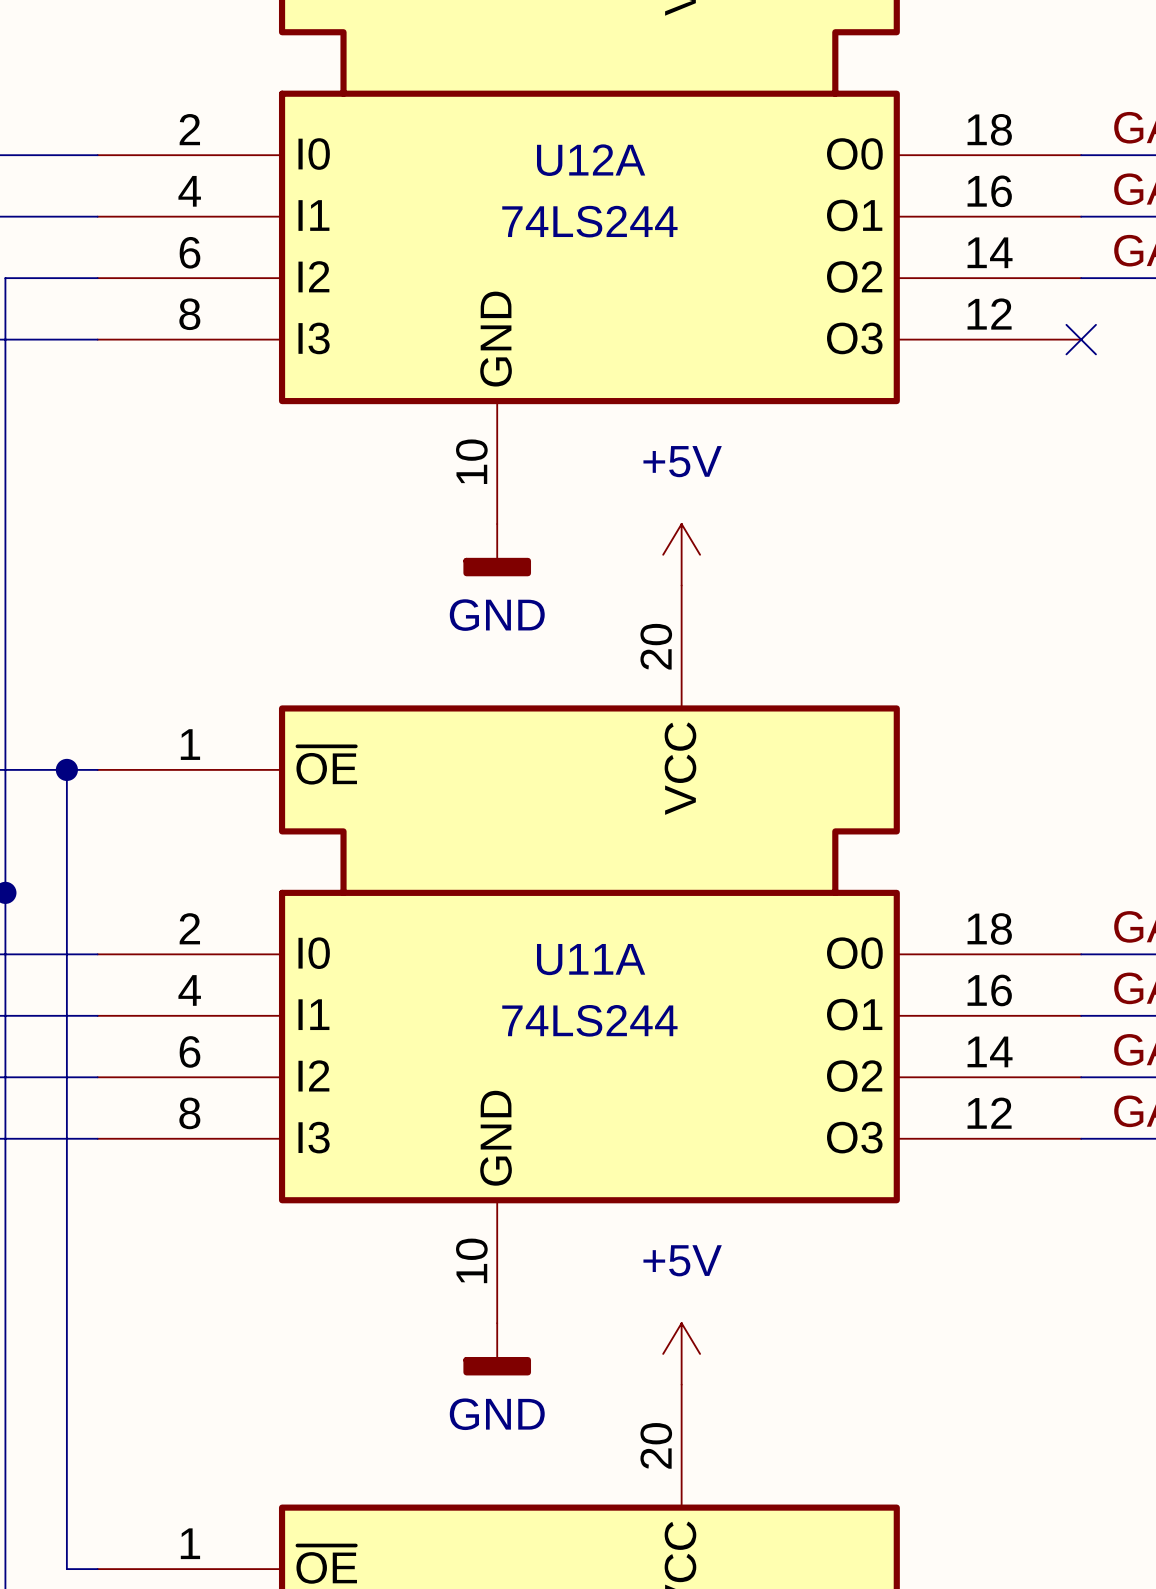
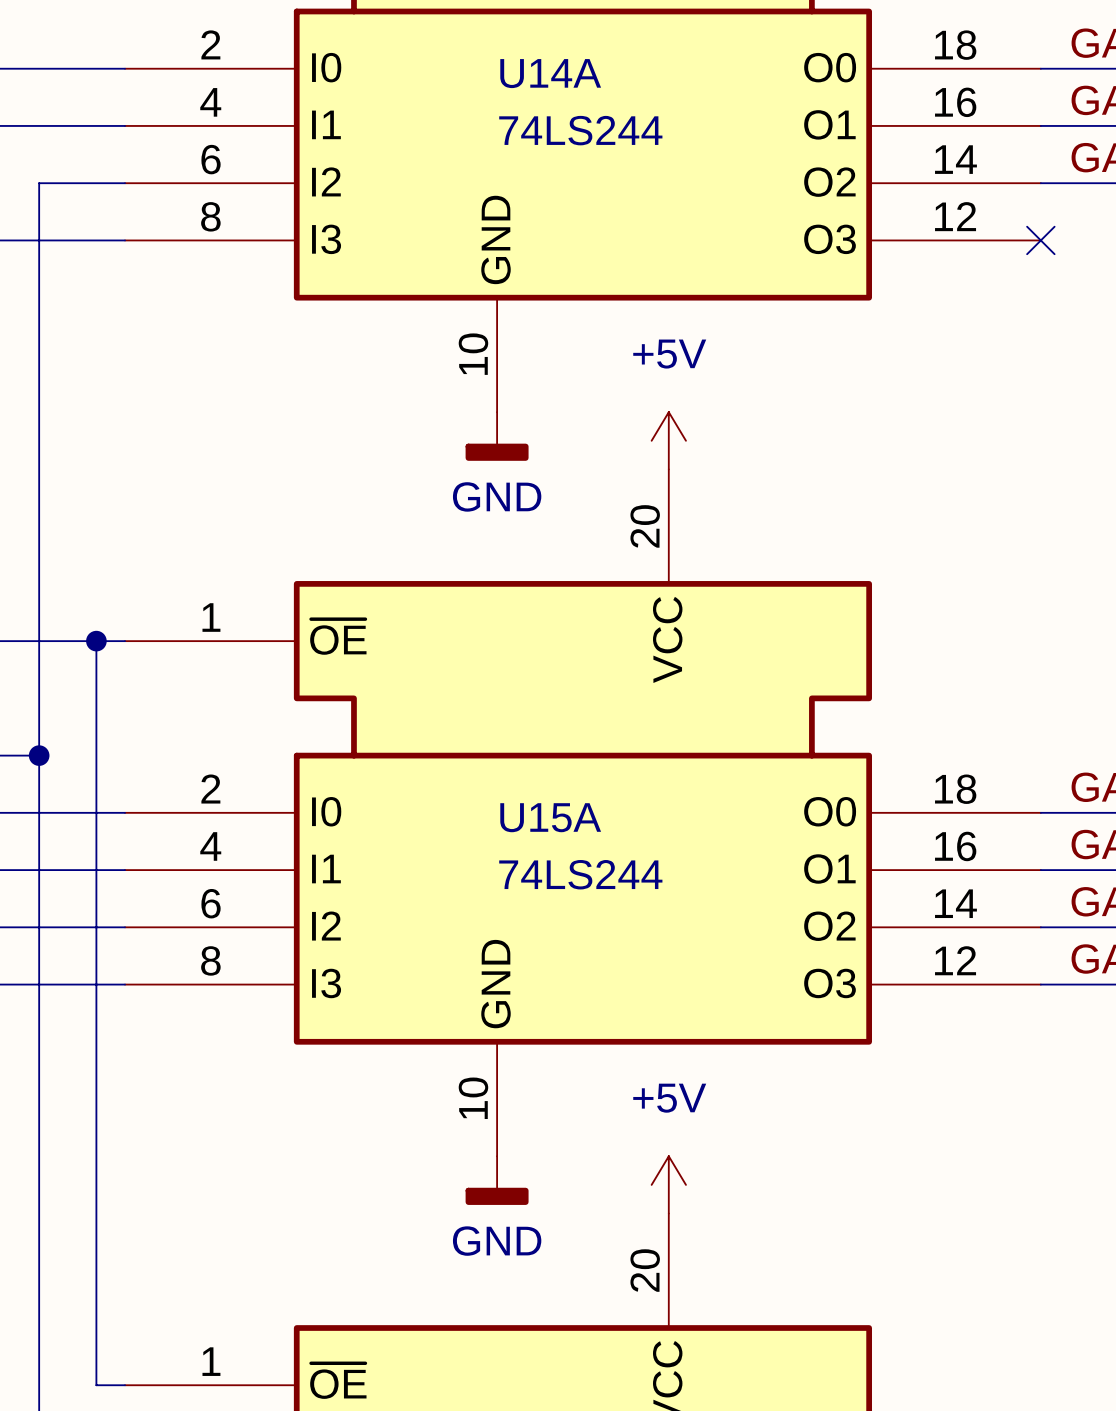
U12A name: U12A (591, 160) -> U14A (550, 73)
U12A value position: 74LS244 (589, 221) -> 74LS244 (580, 130)
U11A name: U11A (591, 959) -> U15A (550, 817)
U11A value position: 74LS244 (589, 1020) -> 74LS244 (580, 874)

